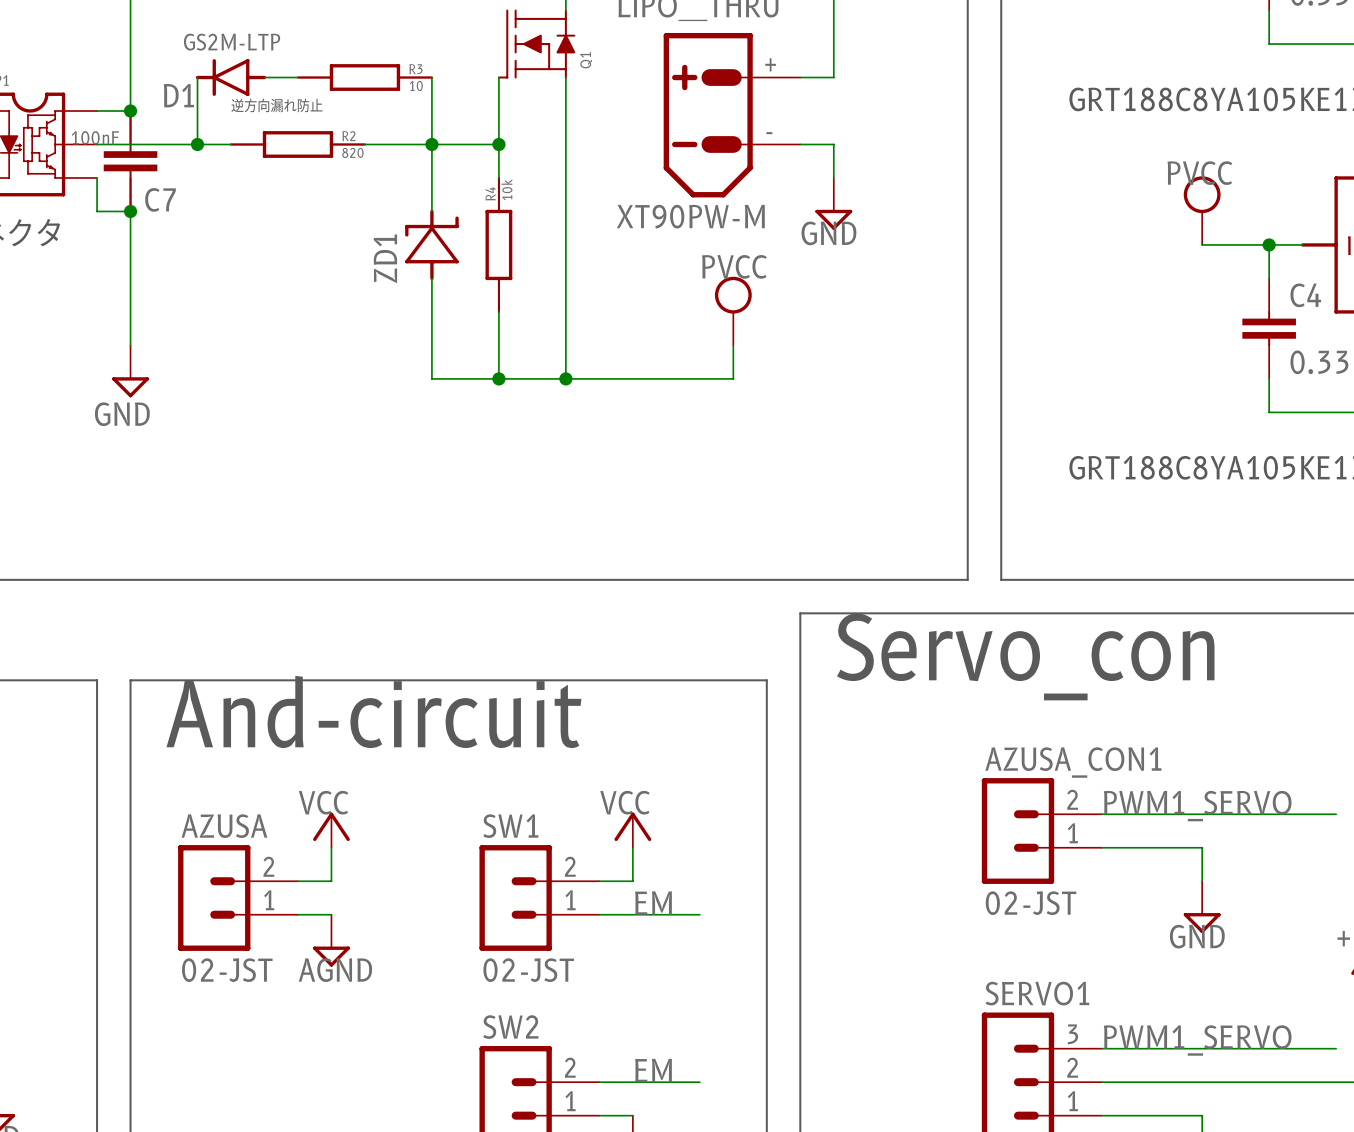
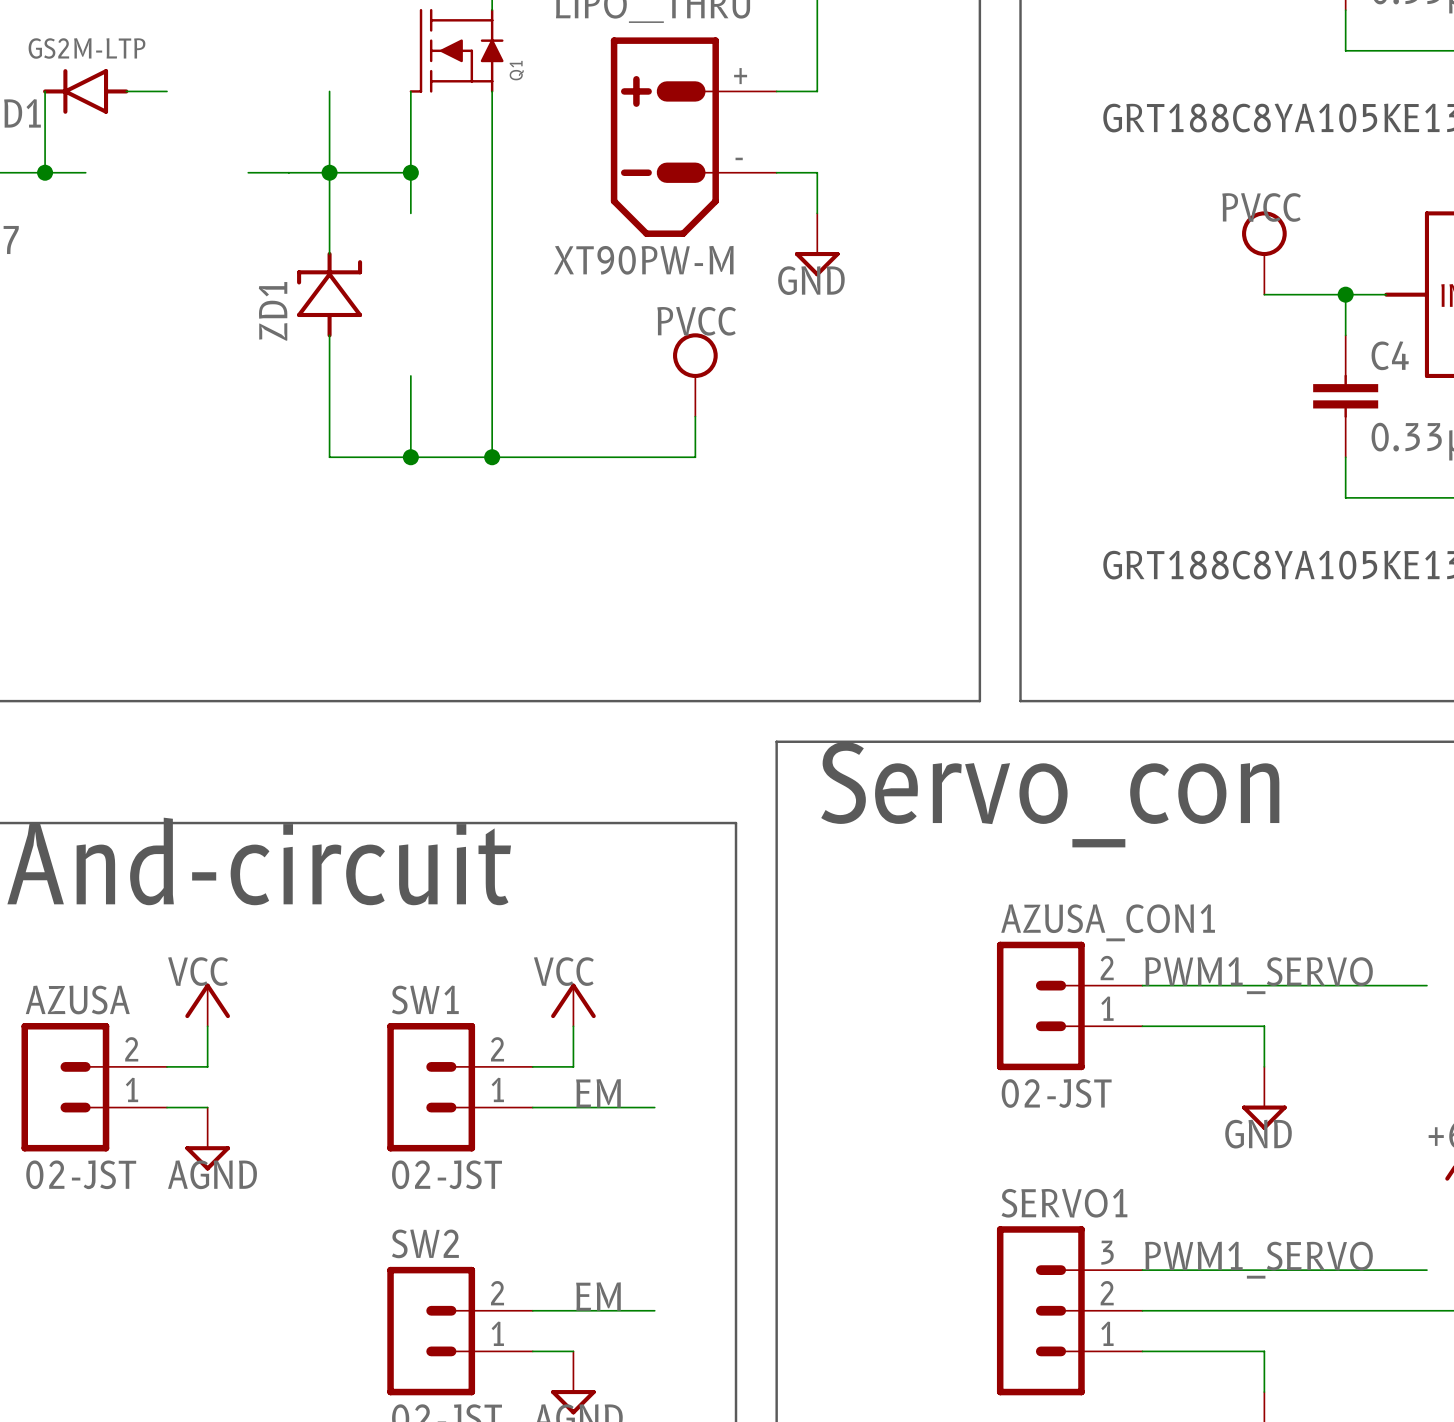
R3: 10 (364, 77) -> none
text: 逆方向漏れ防止 (276, 105) -> none
R2: 820 (297, 144) -> none
R4: 10k (498, 244) -> none

